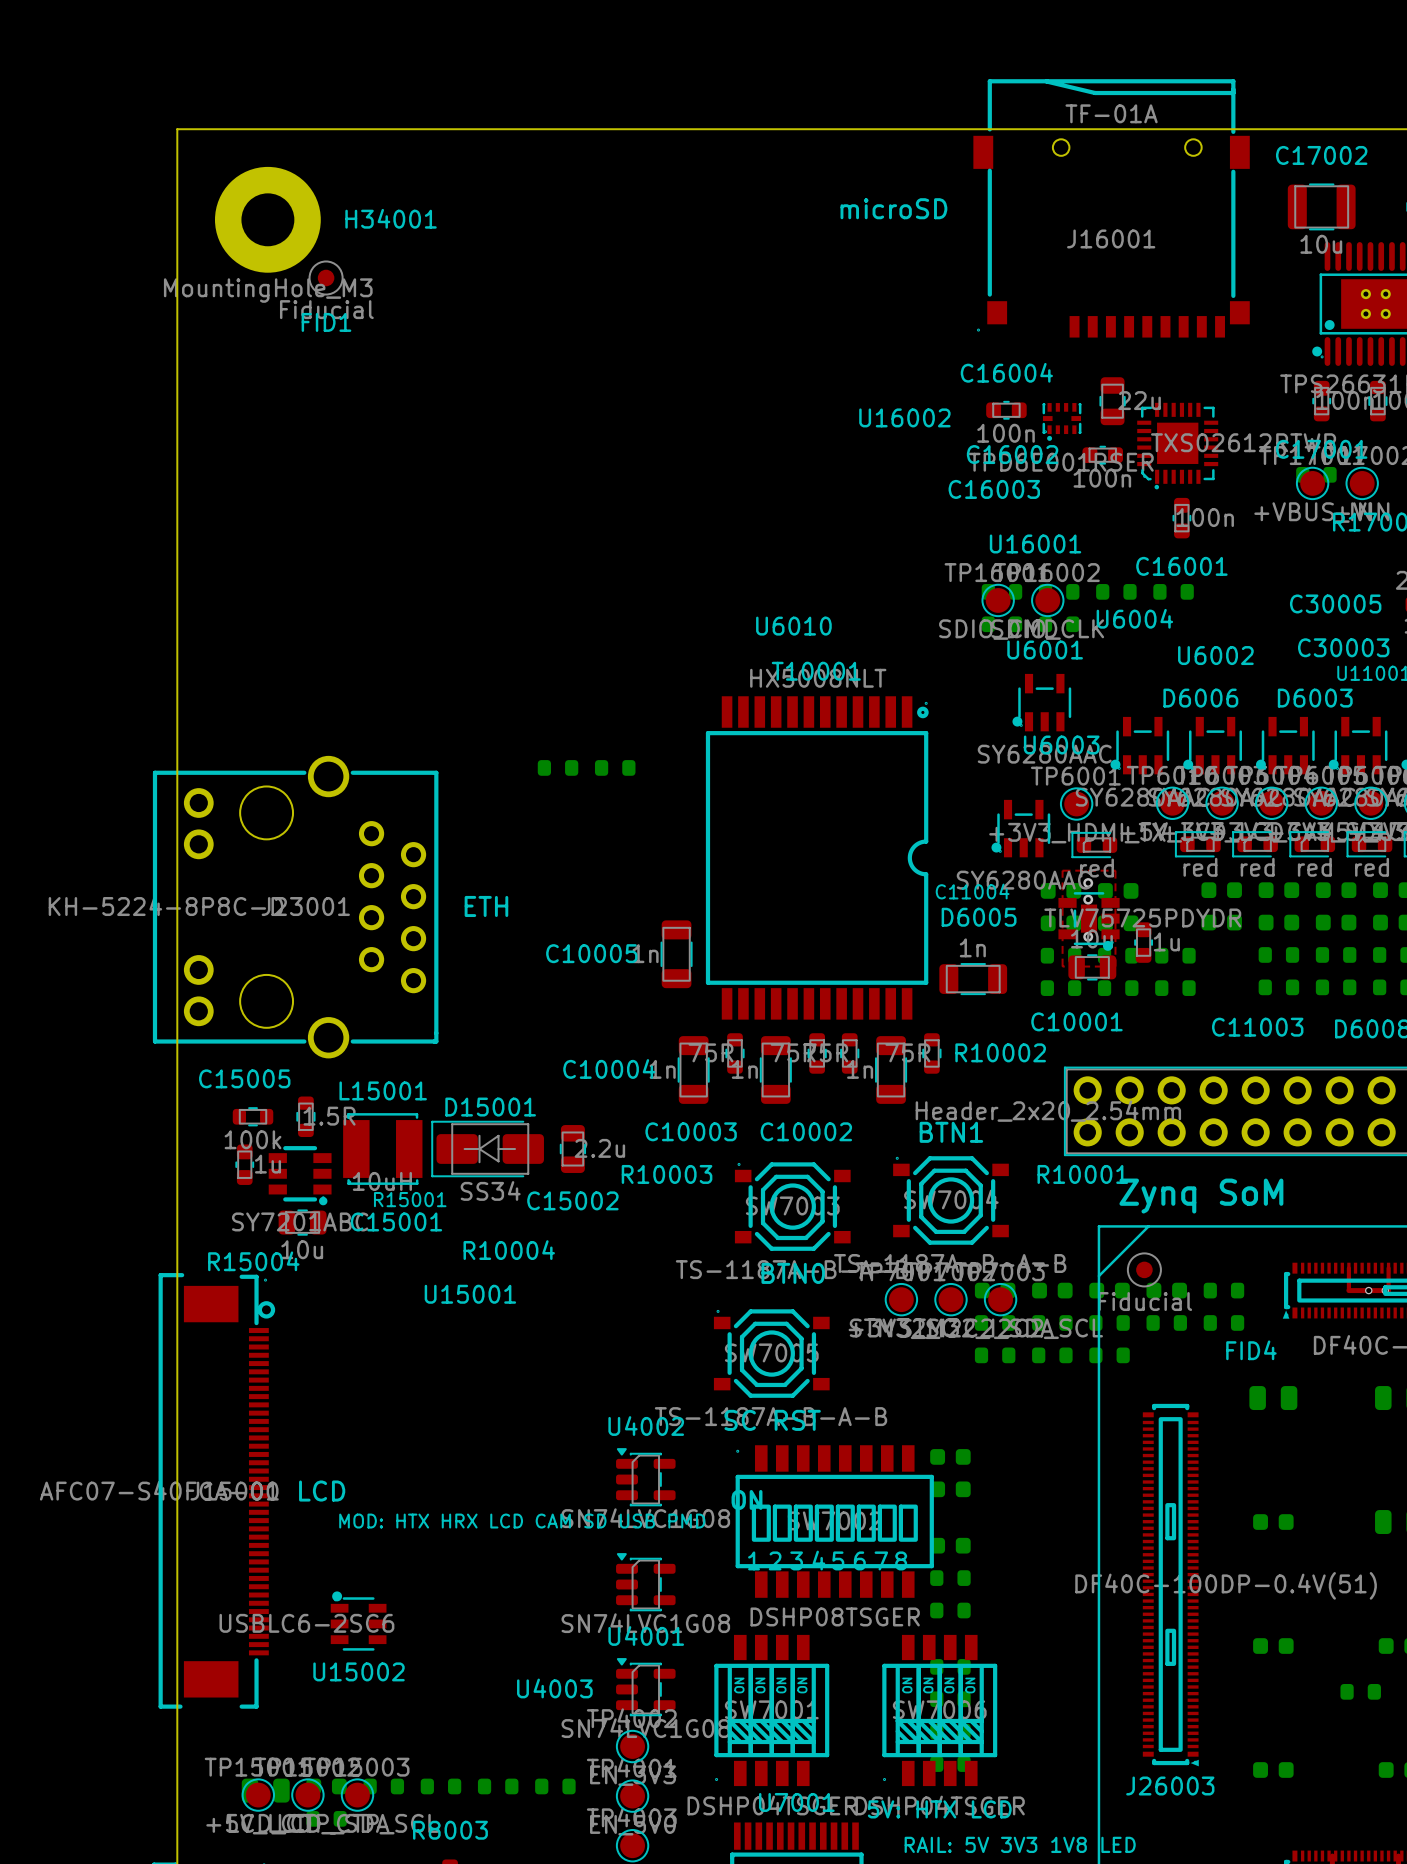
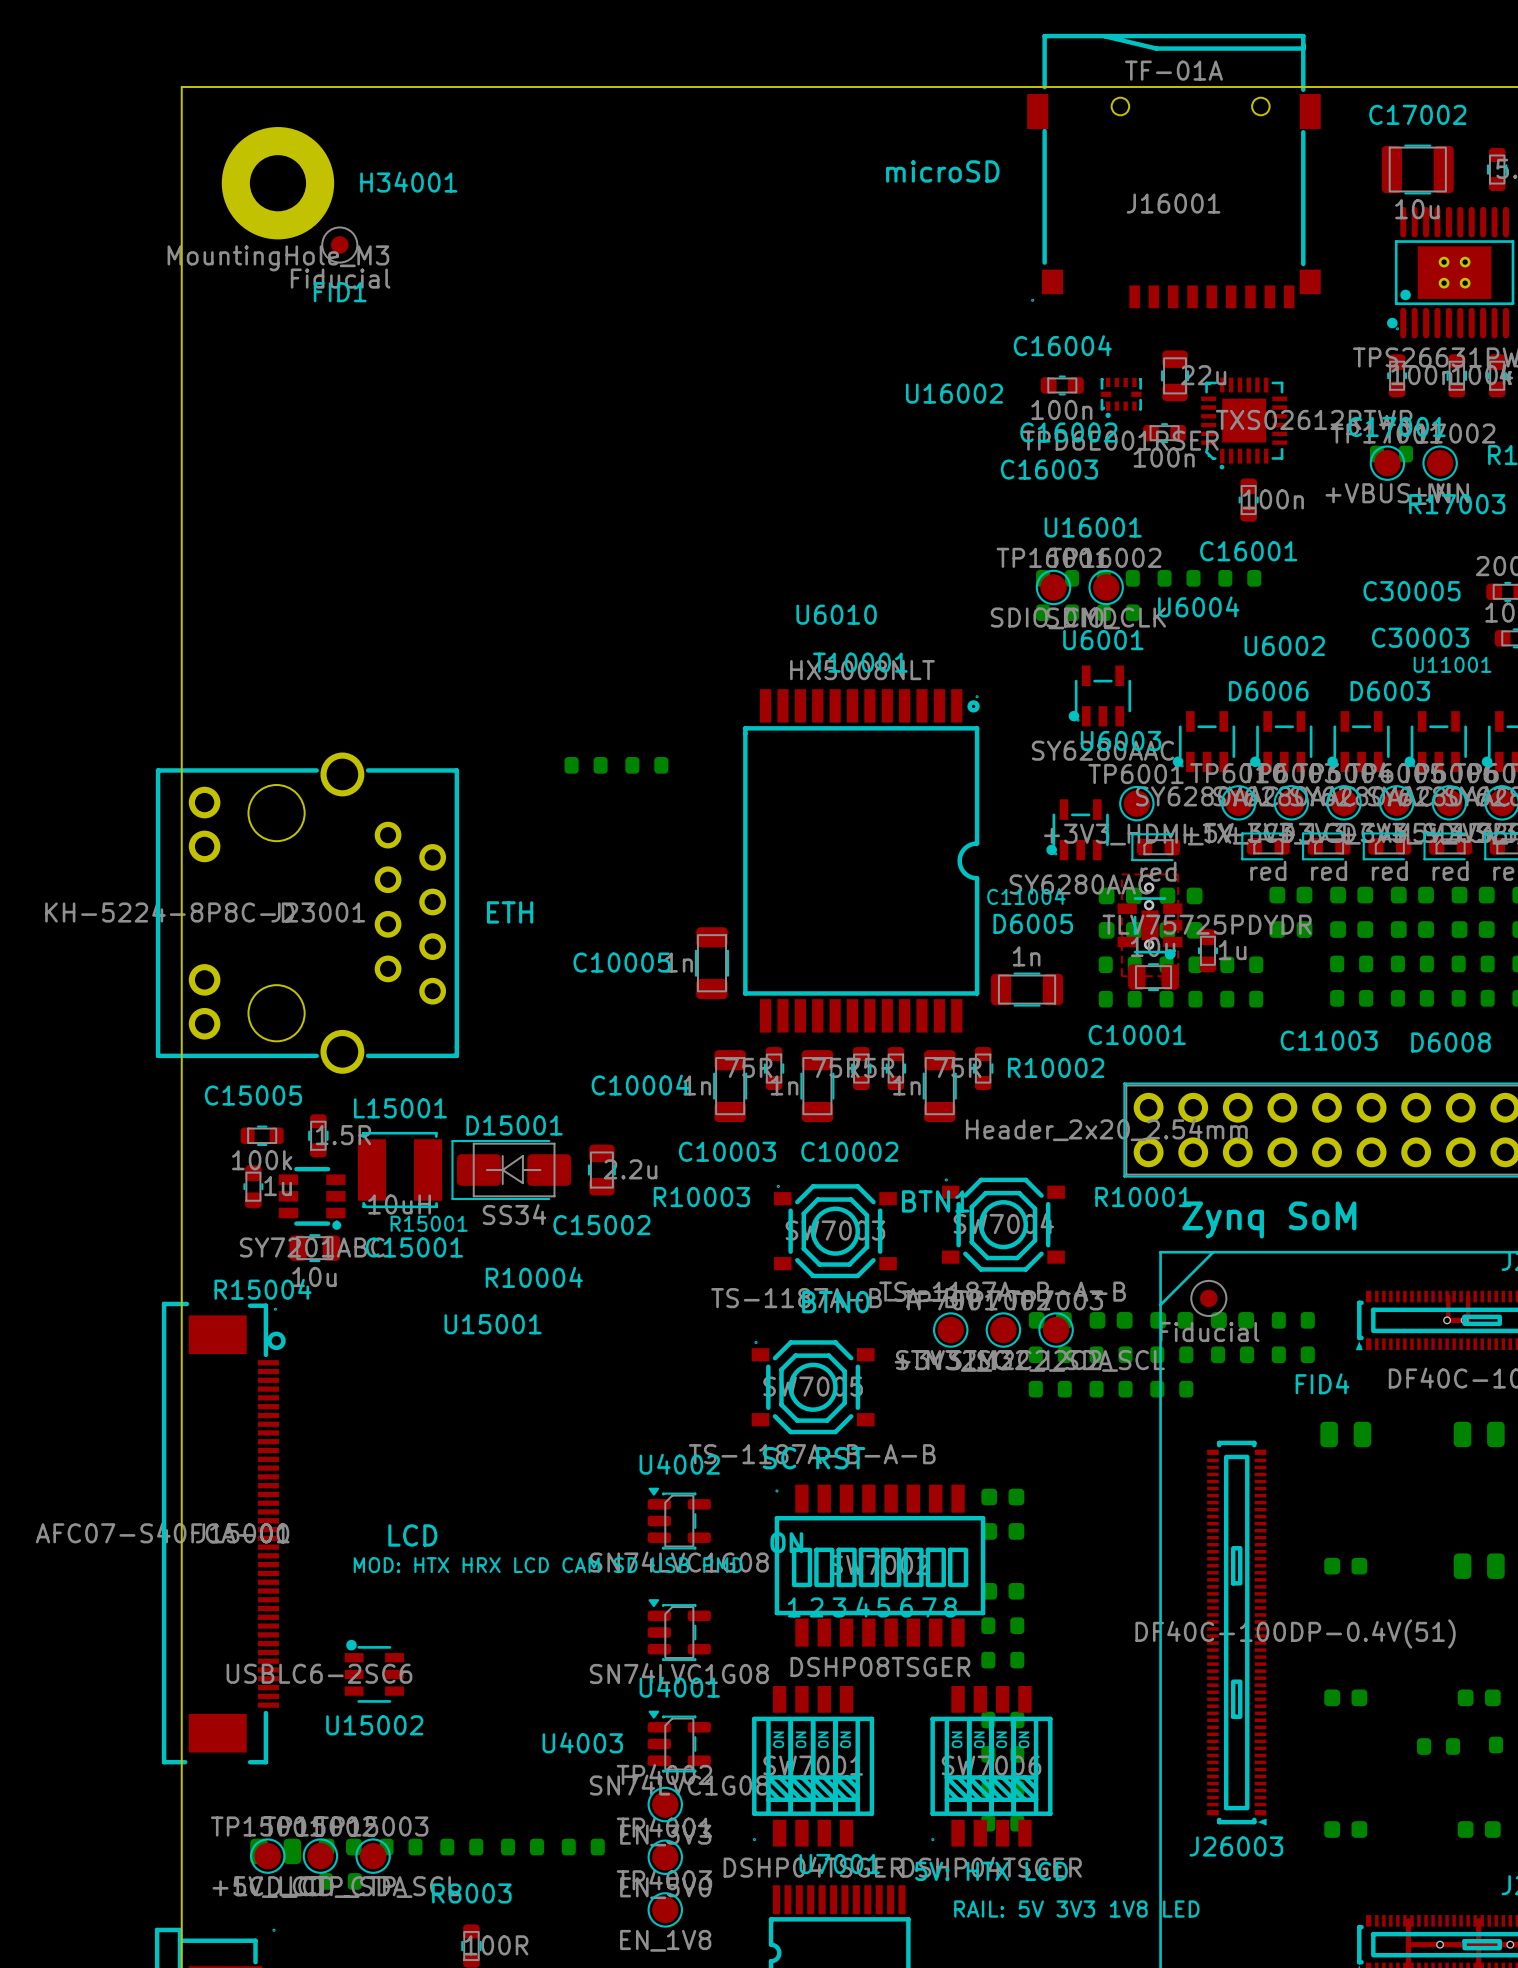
C17002 position: (1321, 206) -> (1417, 169)
text position: BTN1 (951, 1132) -> BTN1 (935, 1201)
top track: (1348, 1268) (1348, 1290) (1369, 1290) -> (1448, 1296) (1448, 1320)
text position: LCD (322, 1491) -> LCD (412, 1535)

